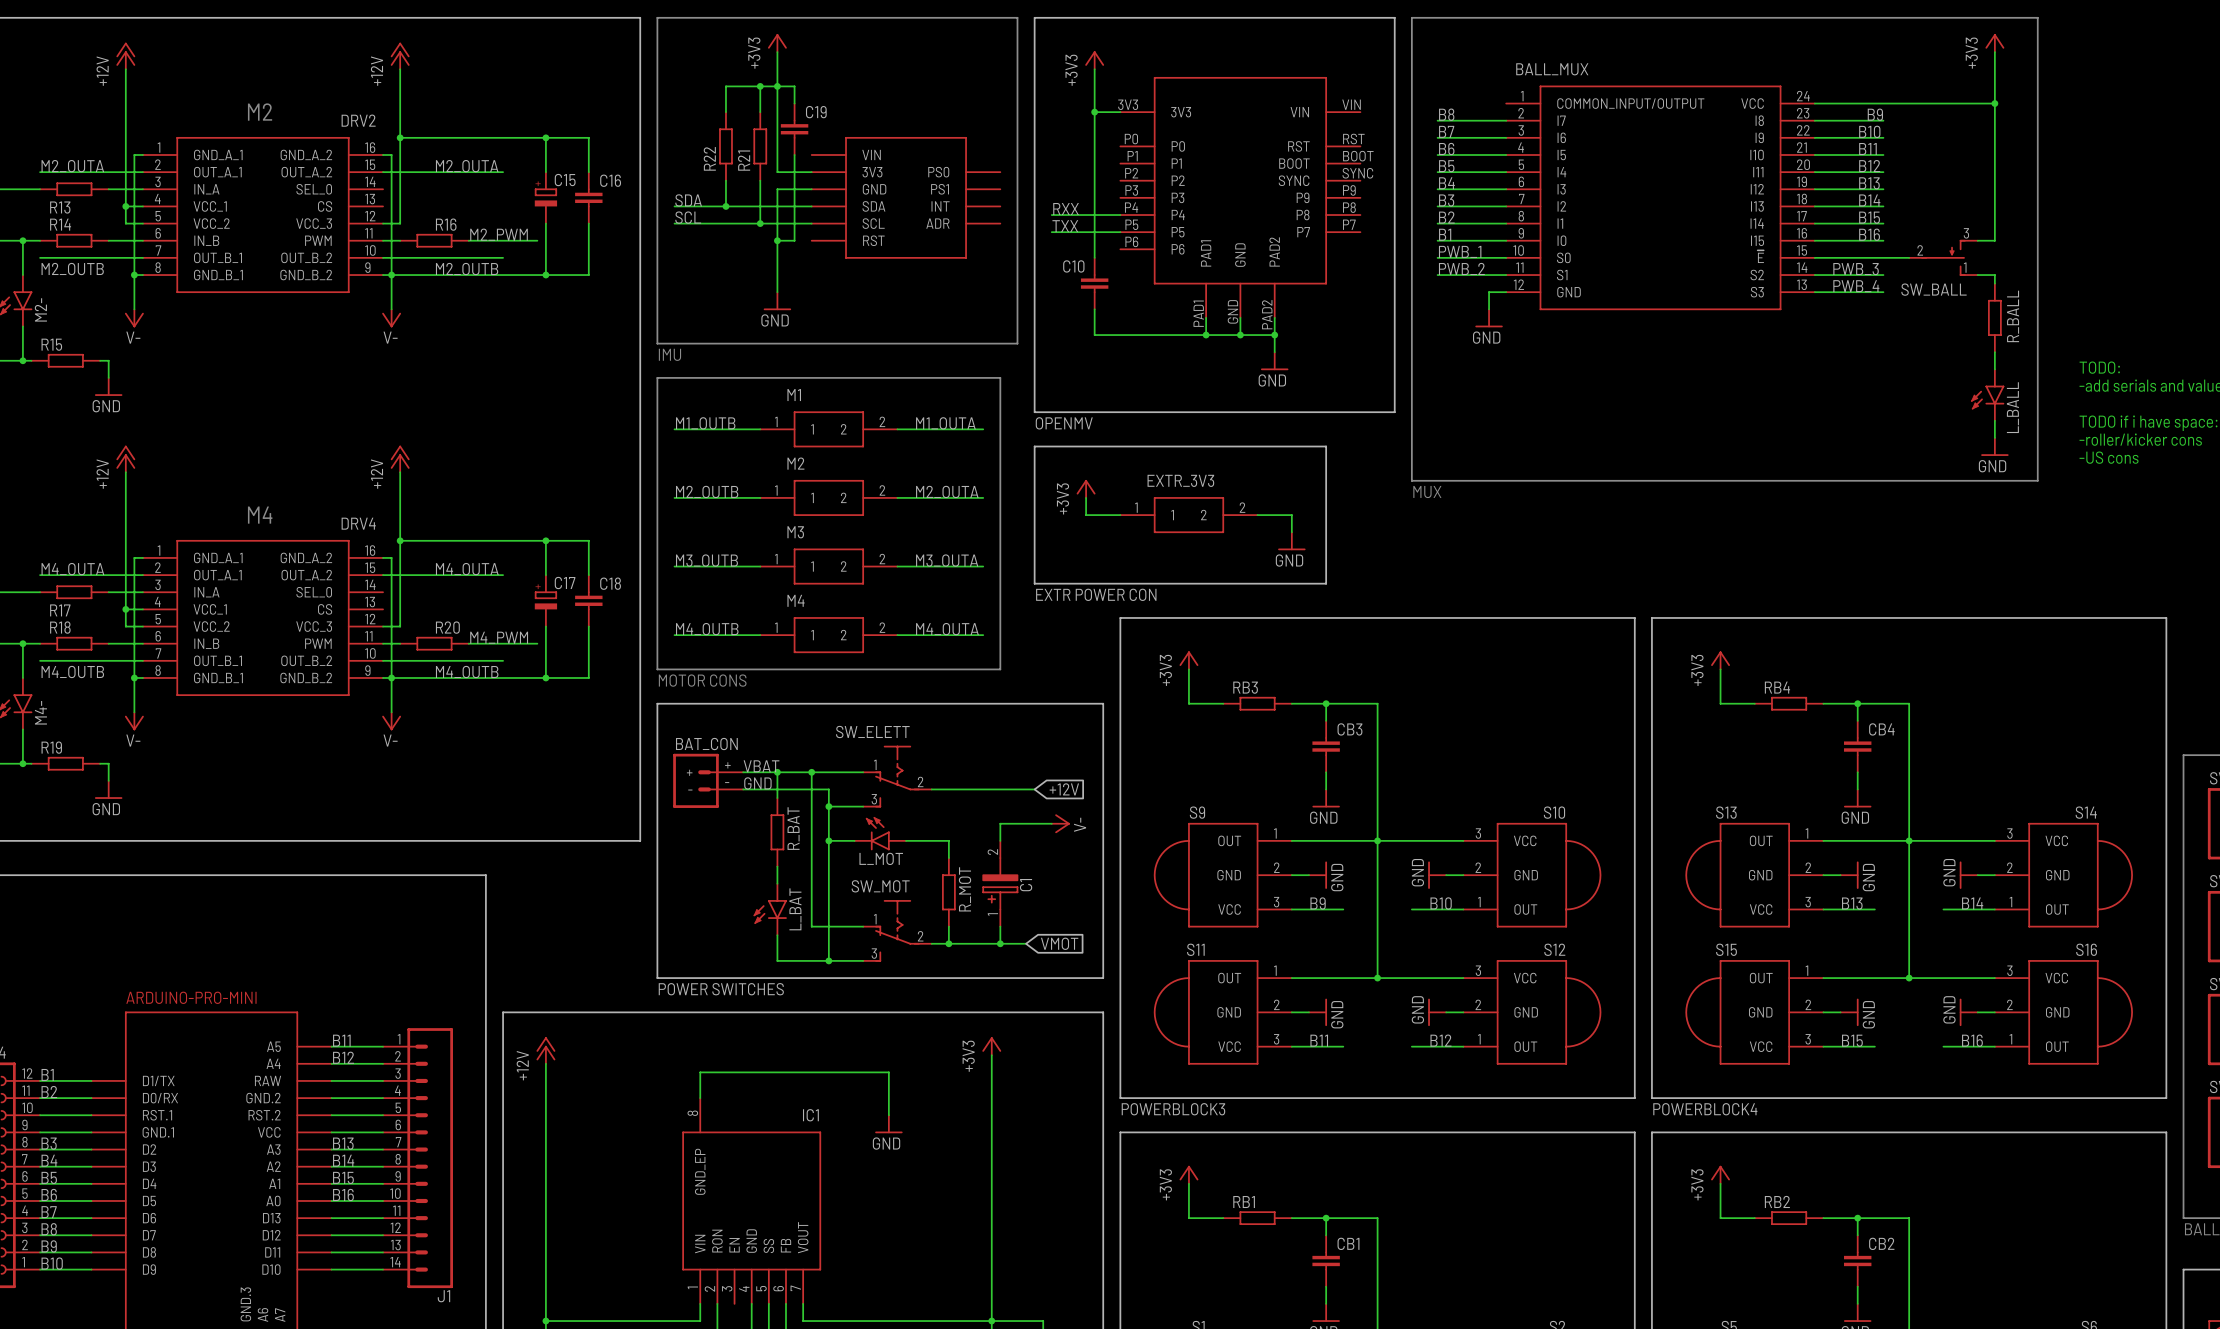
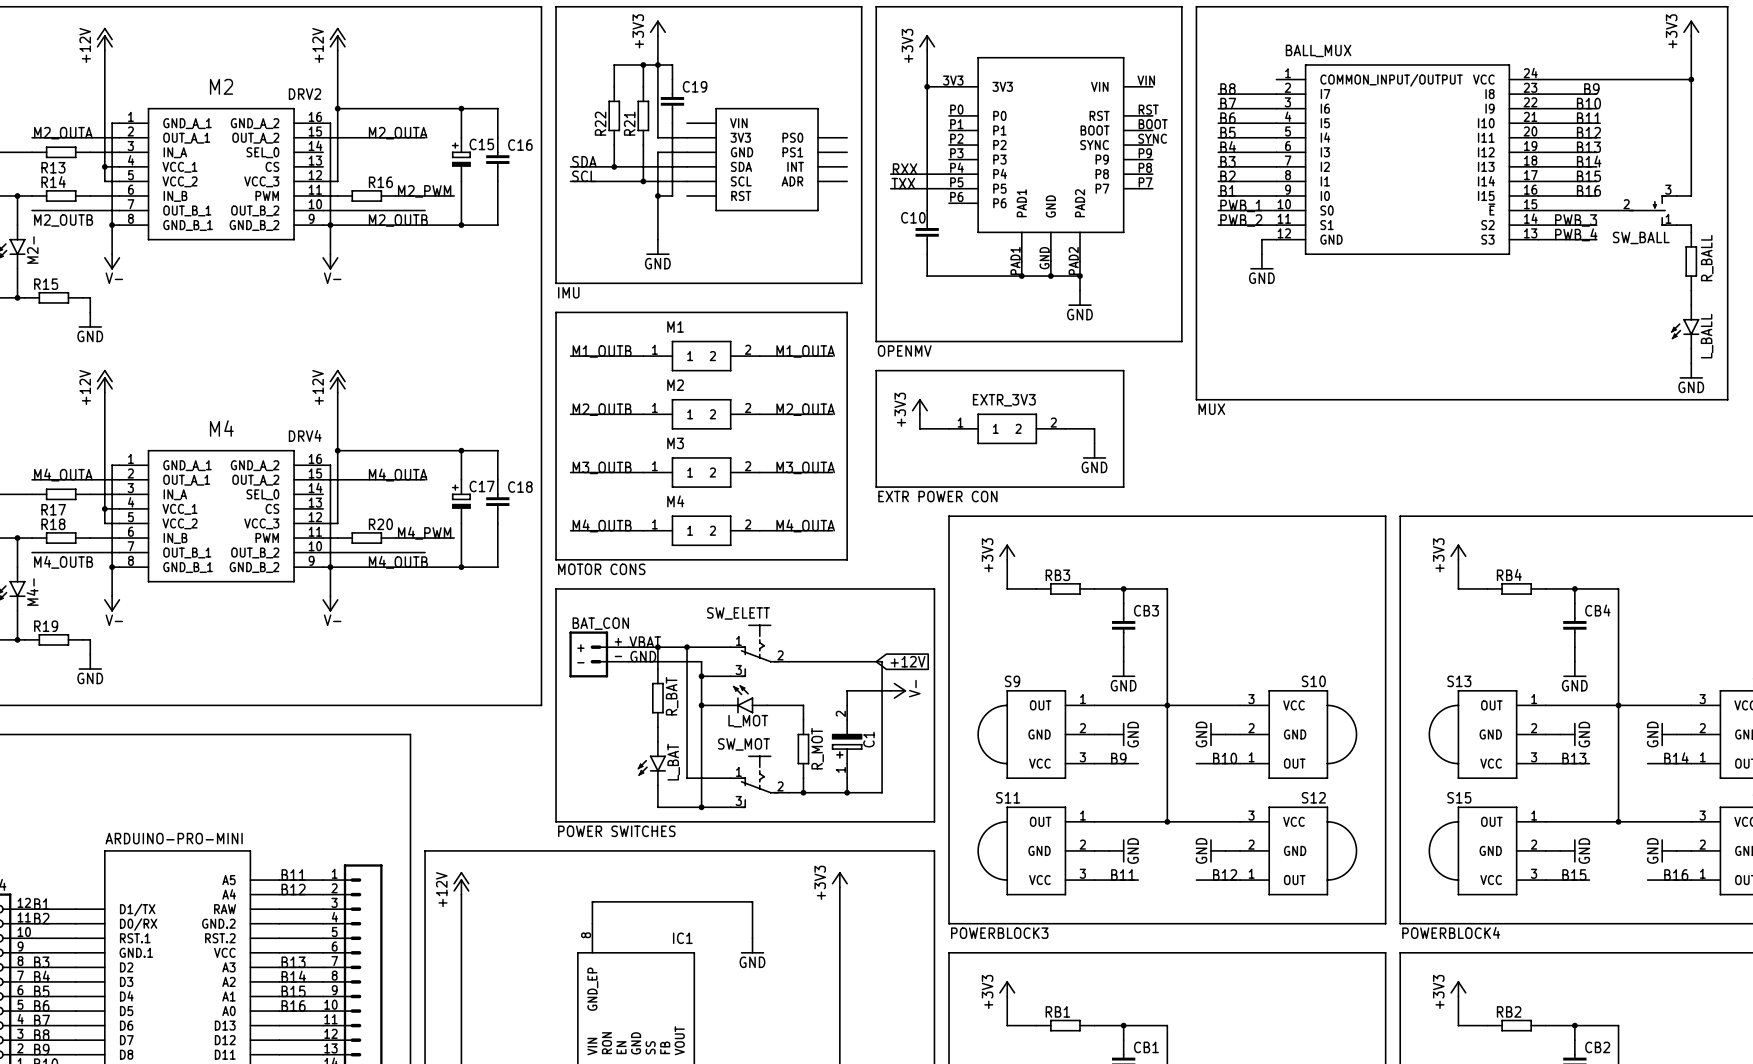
wire: none -> (876, 661) (882, 661) (882, 792) (868, 792)
global label: VMOT (1059, 943) -> none

